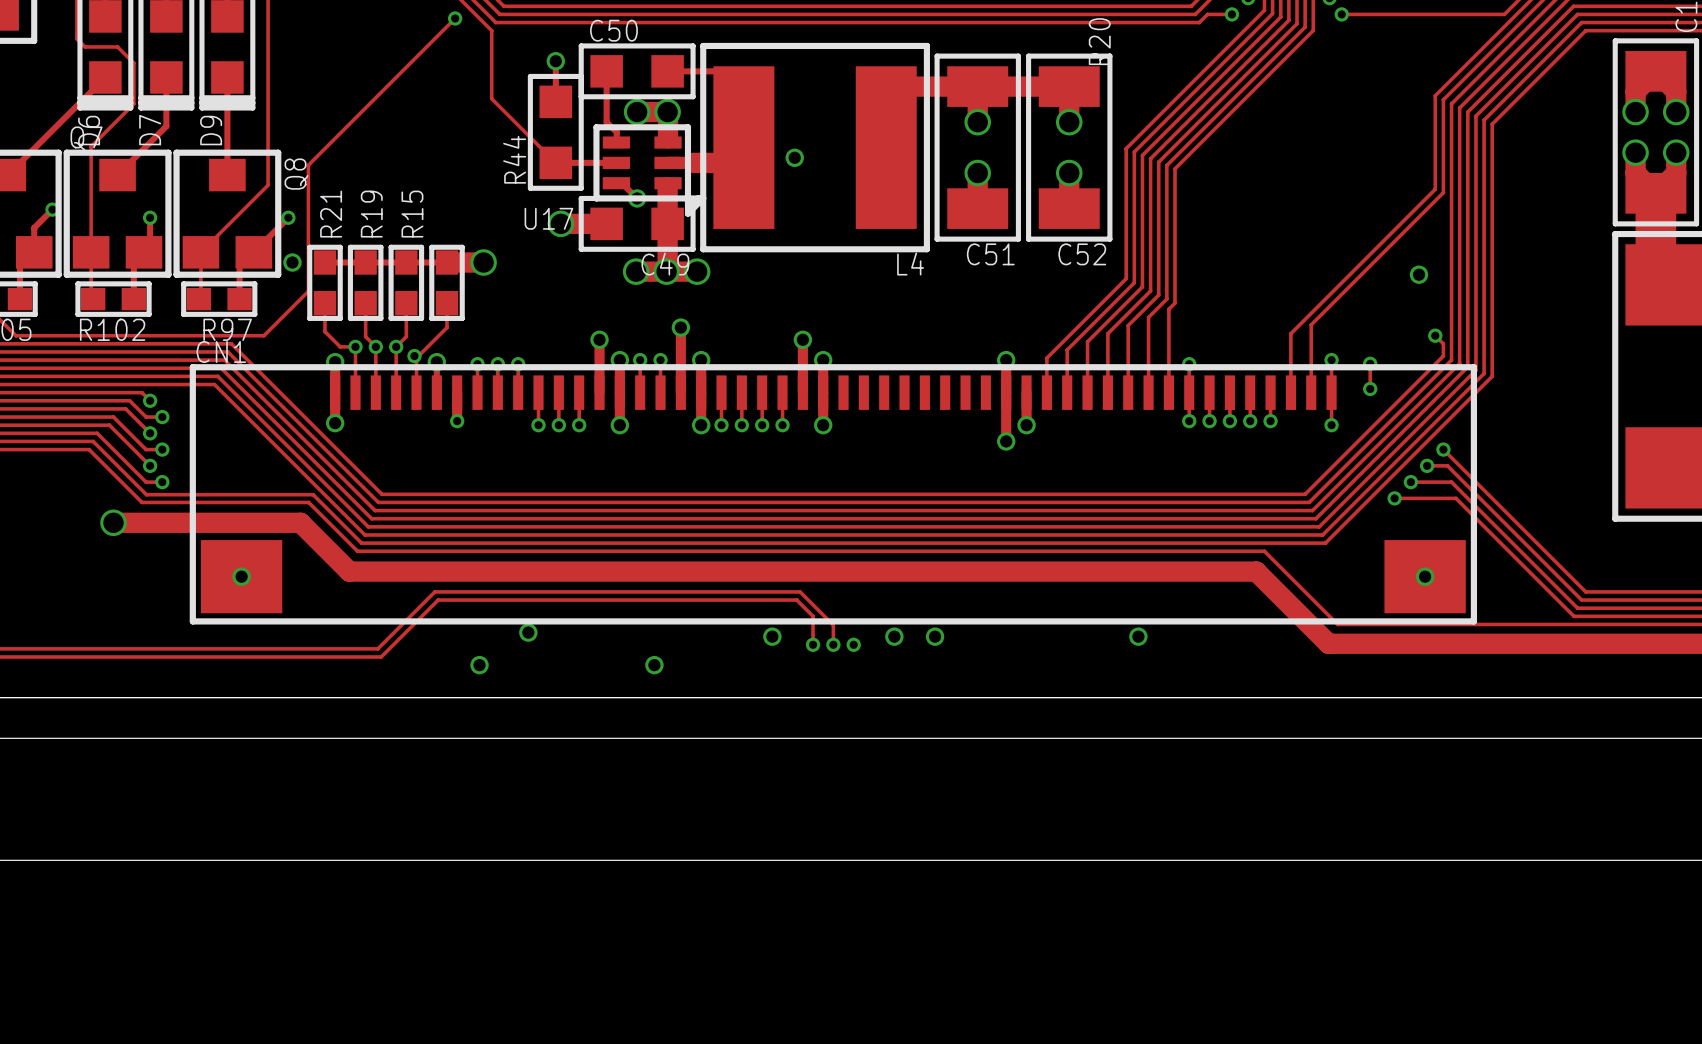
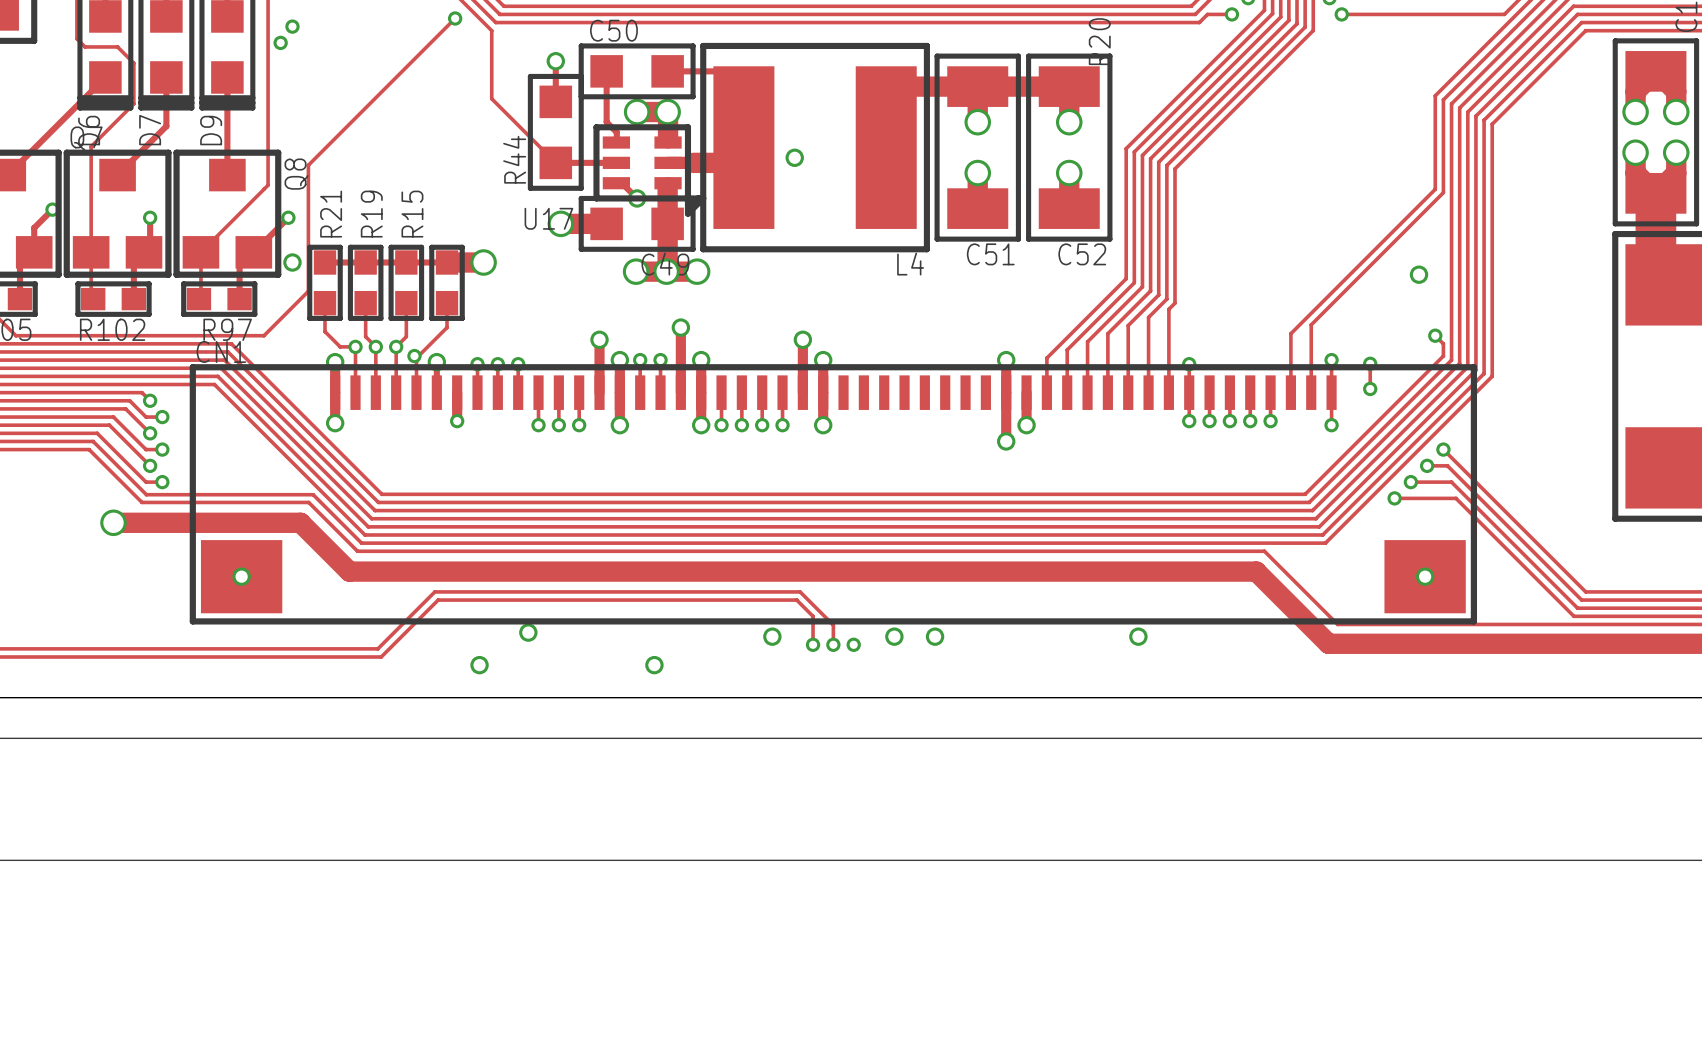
via: none -> (292, 26)
via: none -> (280, 42)

